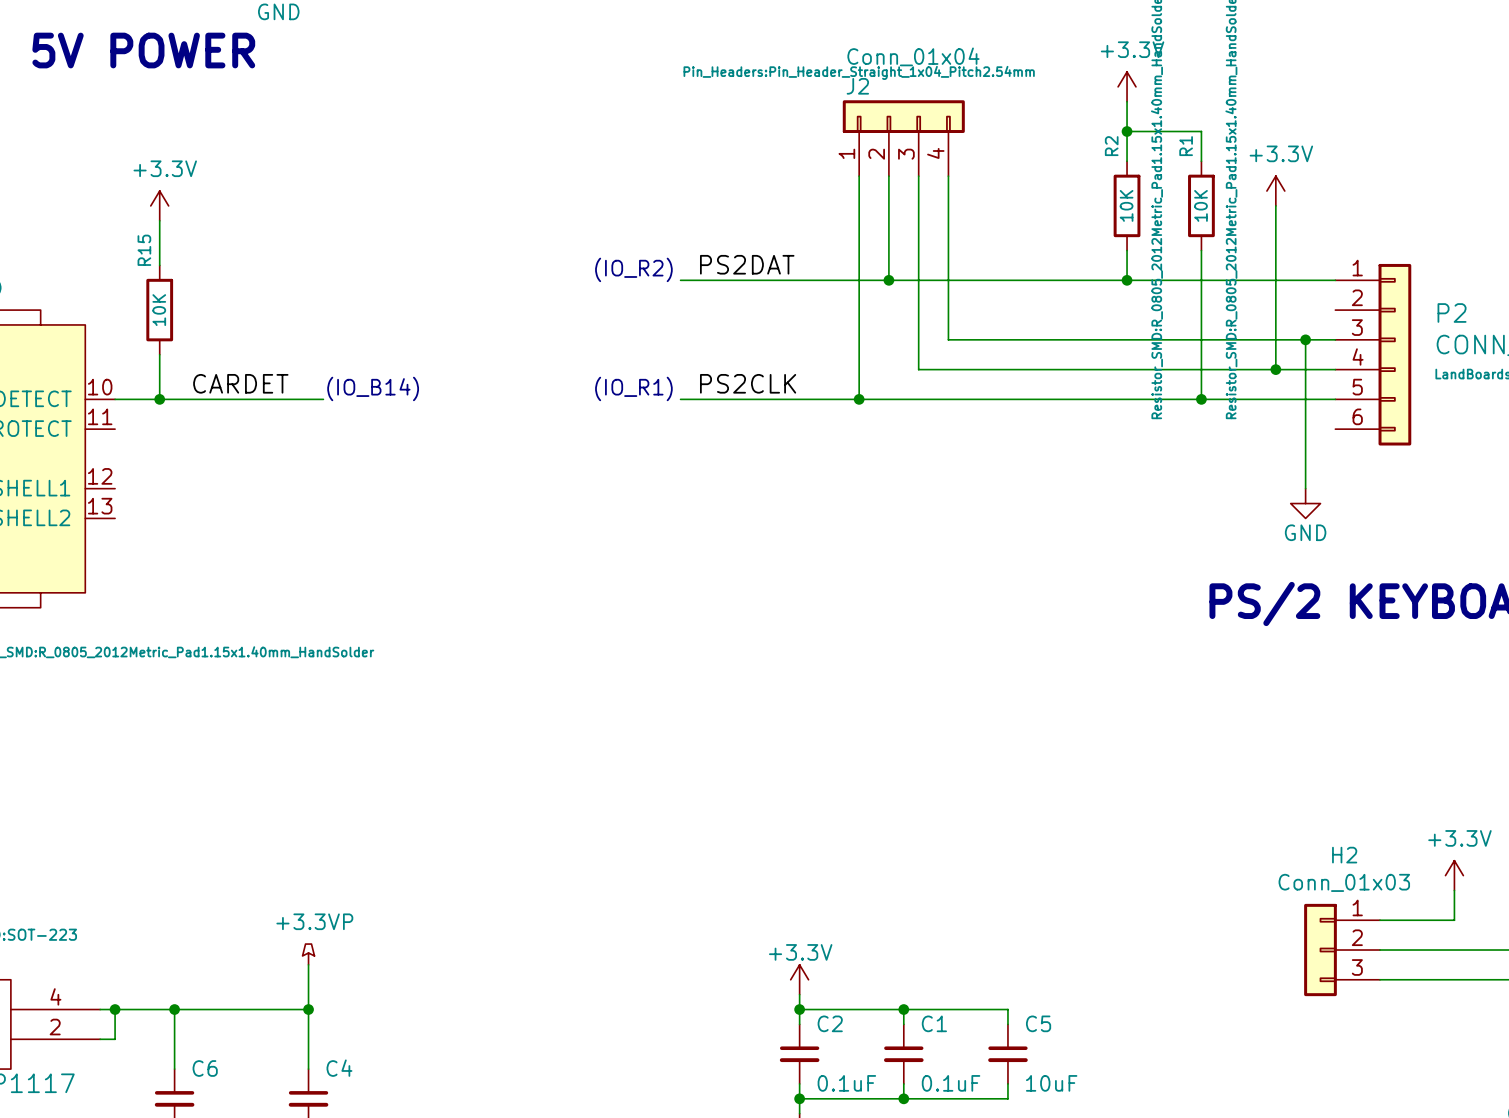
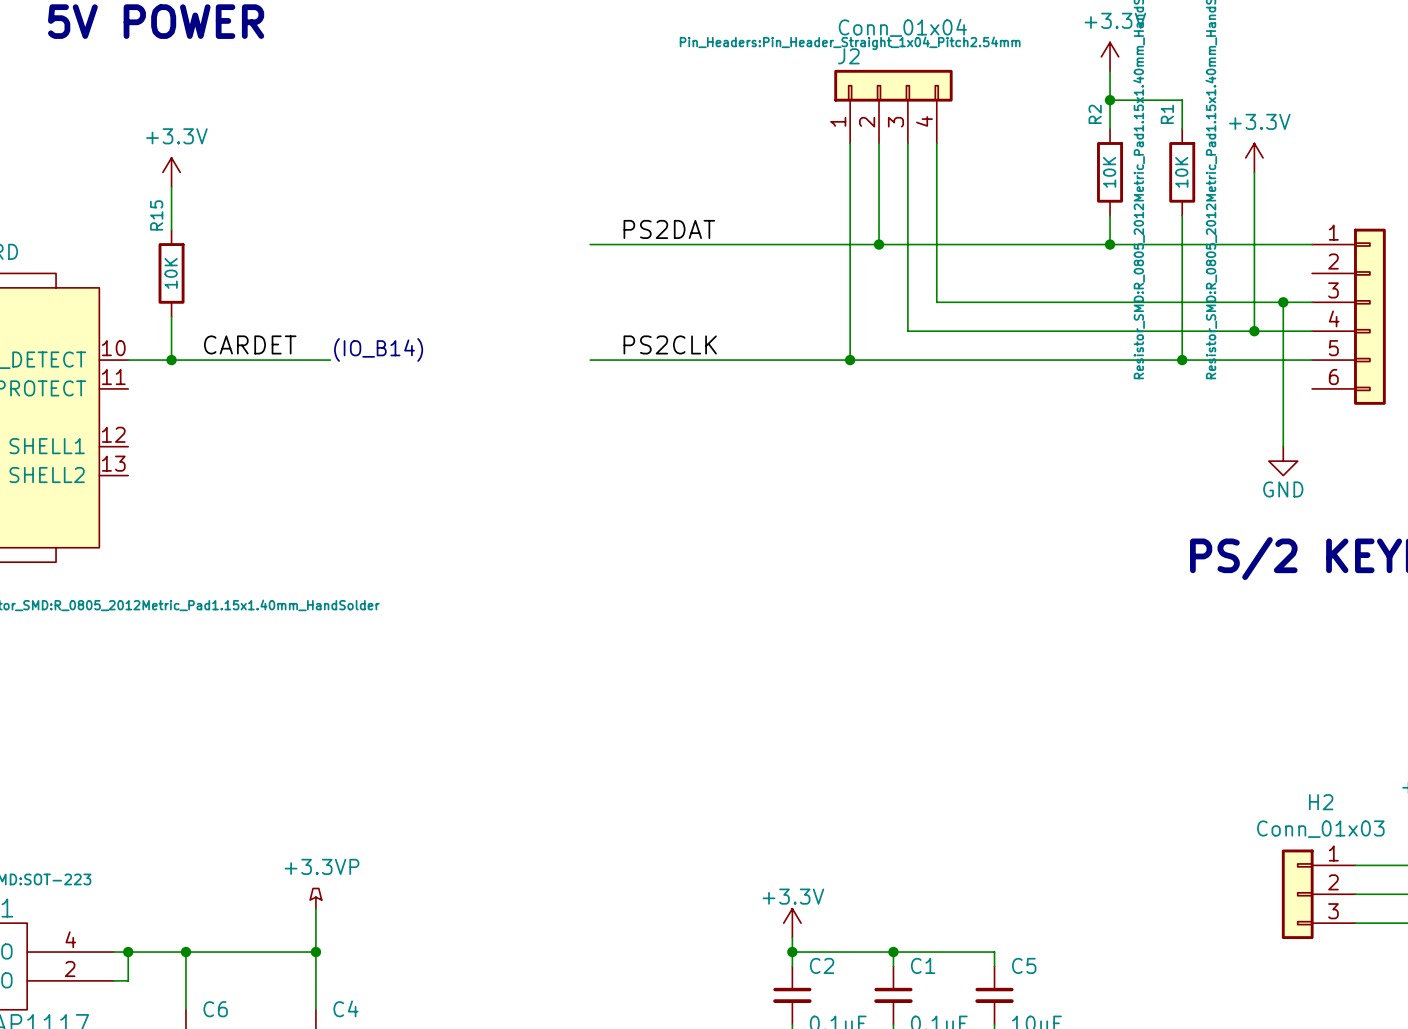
label position: PS2DAT (747, 264) -> PS2DAT (669, 229)
text: (IO_R2) (633, 269) -> none
wire: none -> (590, 244) (676, 244)
label position: PS2CLK (748, 383) -> PS2CLK (670, 344)
text: (IO_R1) (633, 388) -> none
wire: none -> (590, 360) (676, 360)

